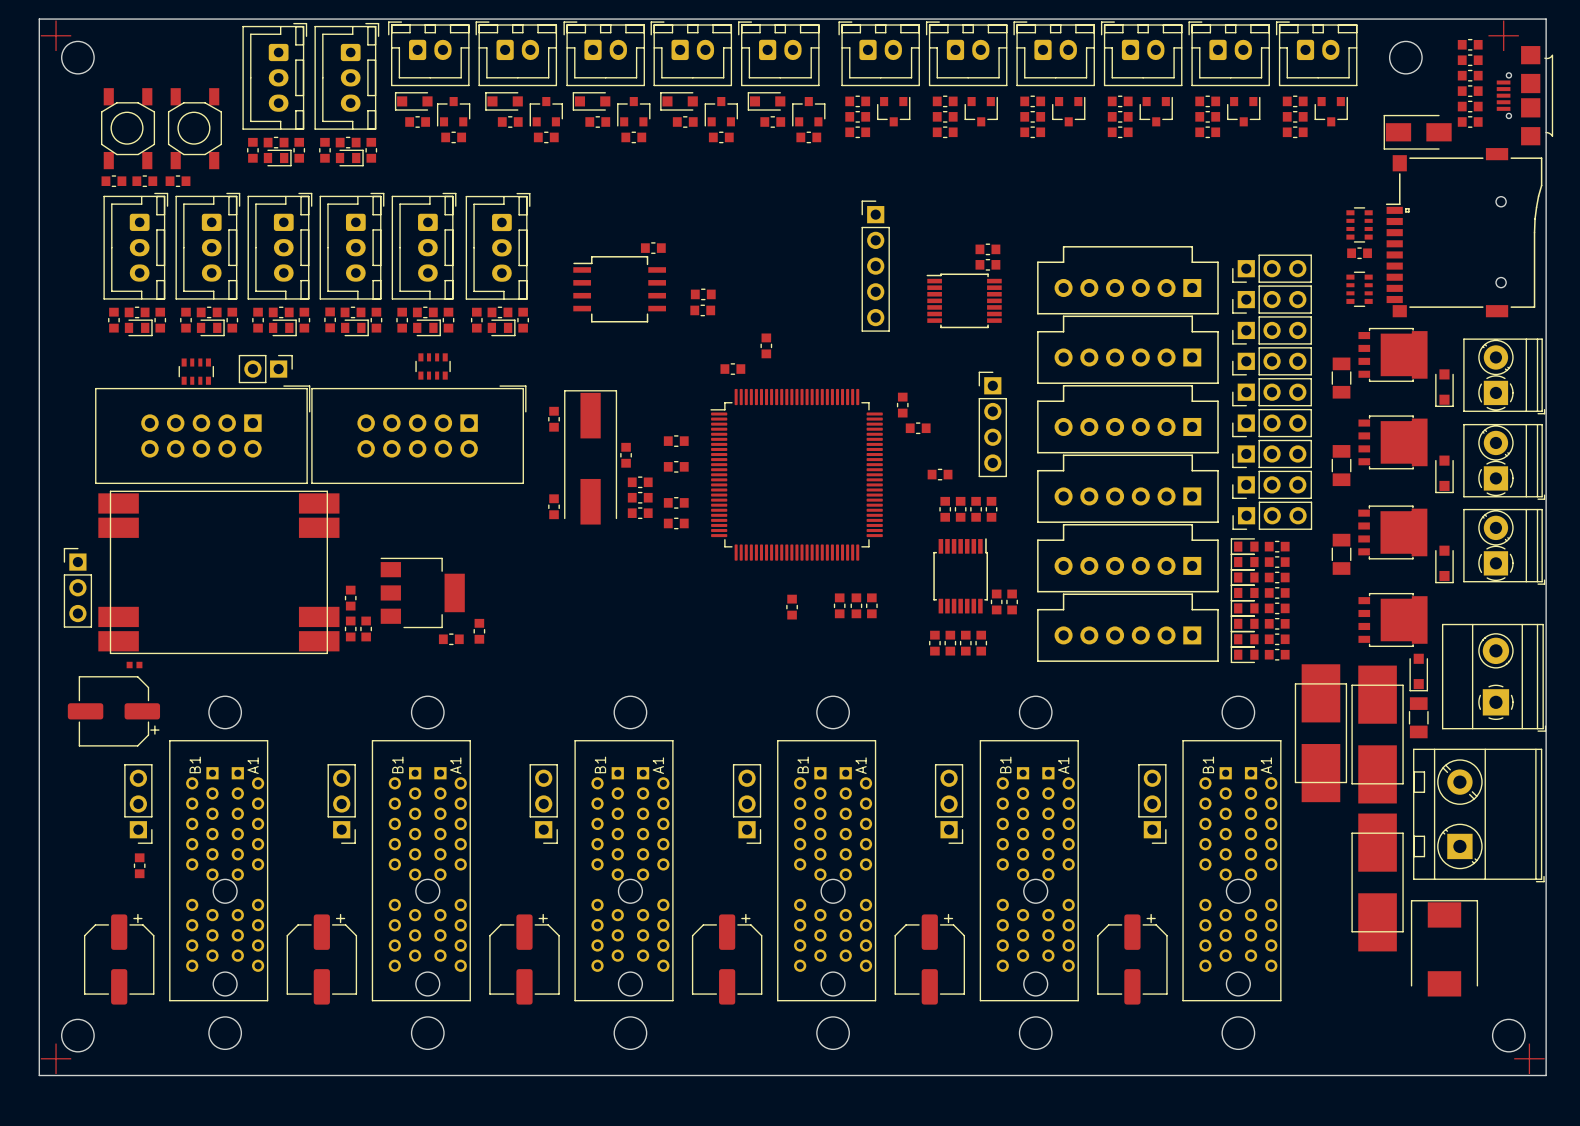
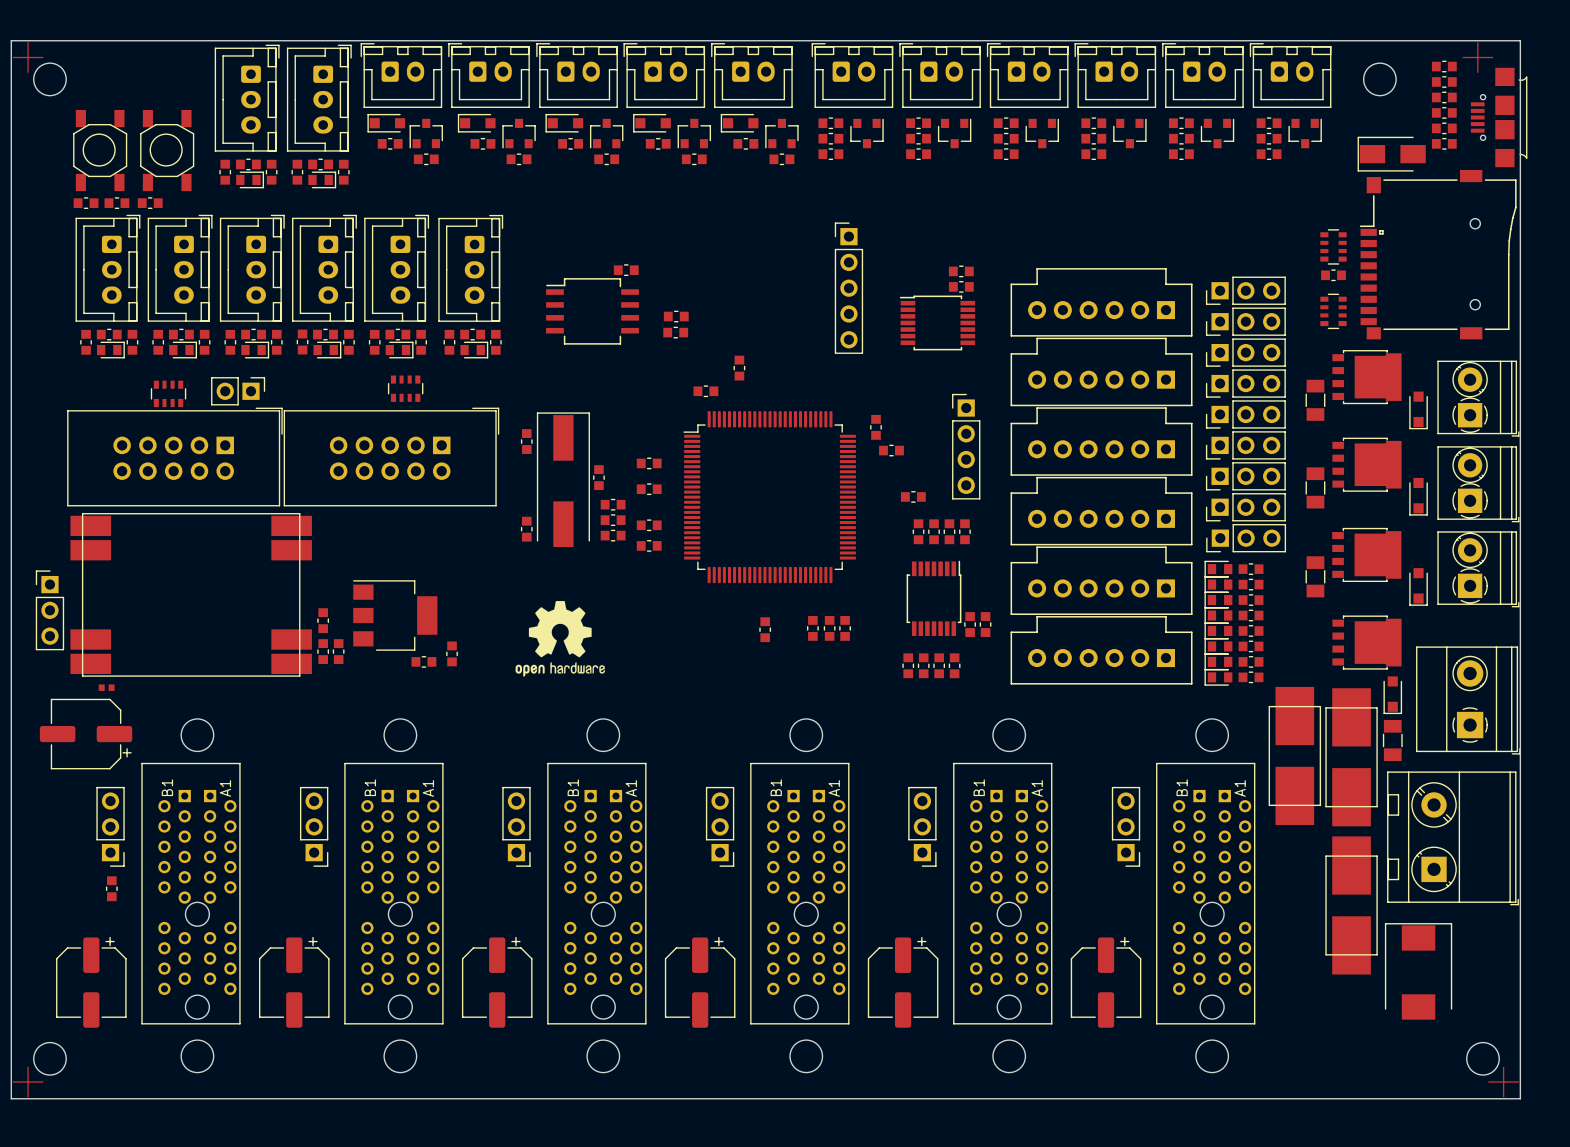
drawing: none -> [515, 600, 605, 677]

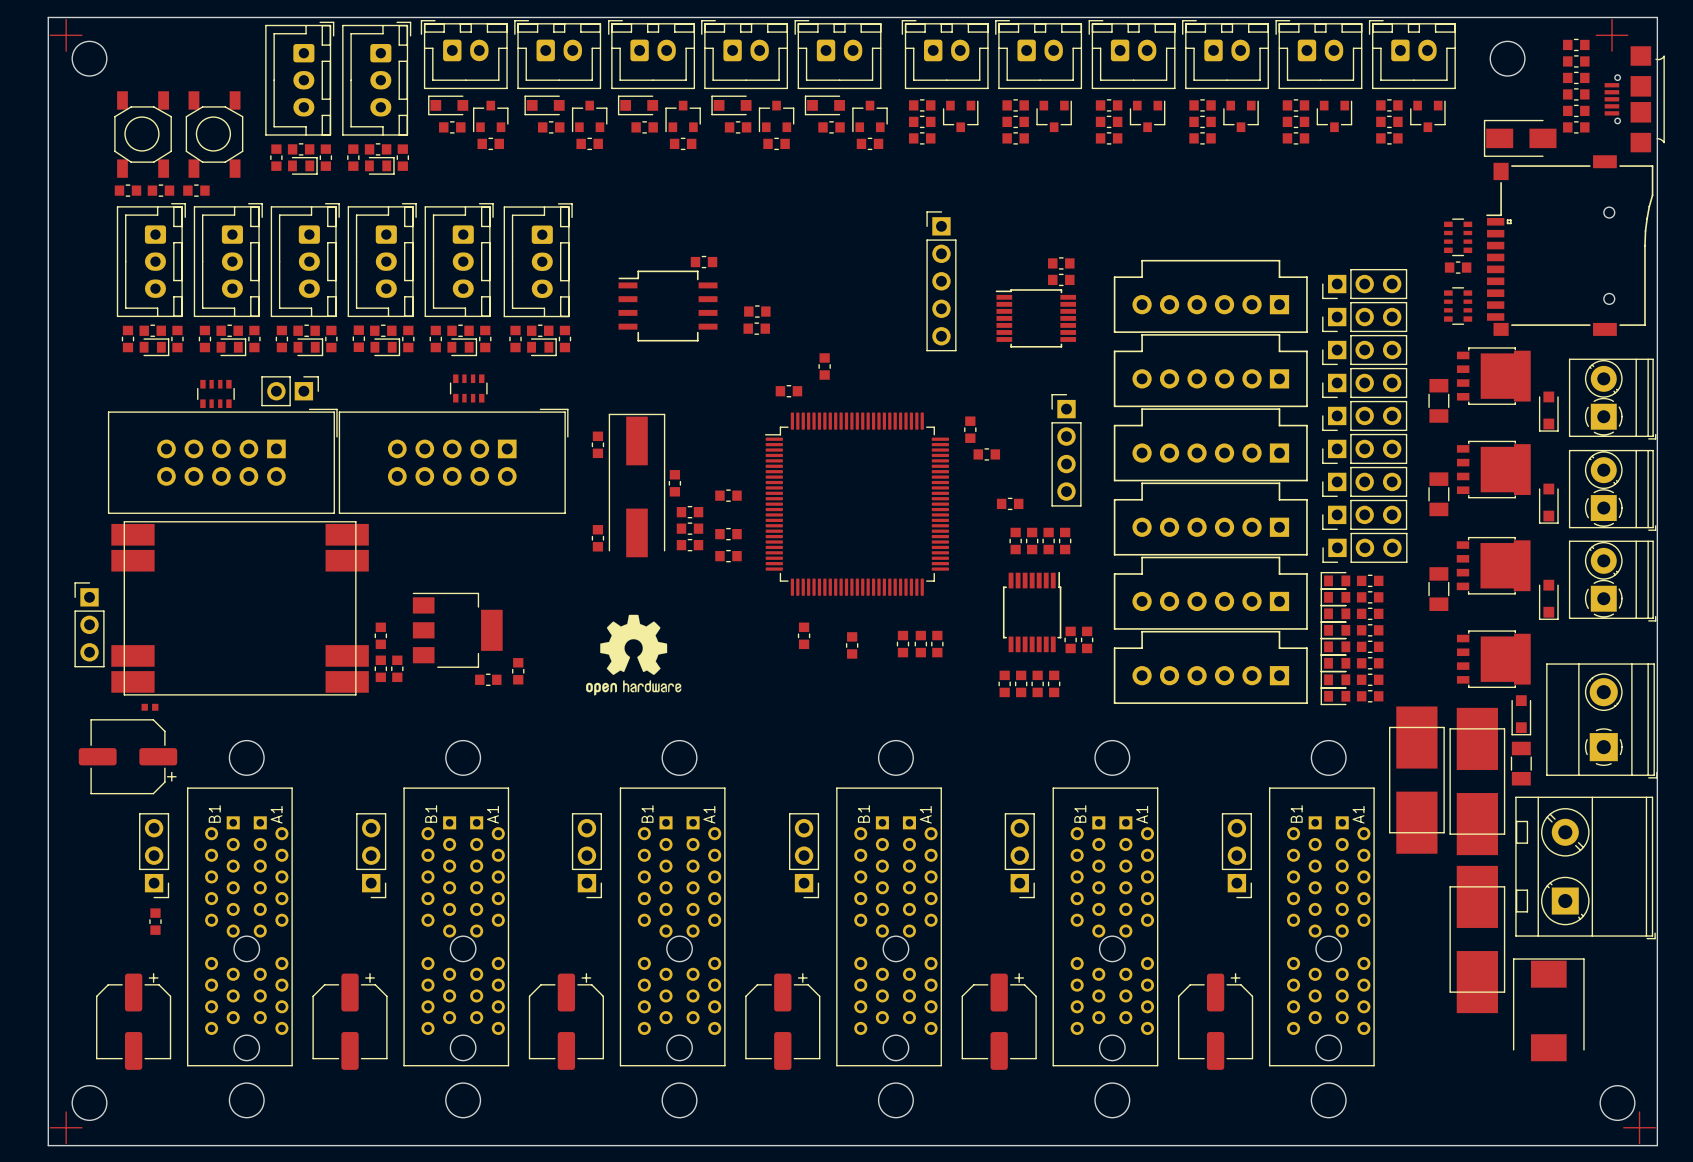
part rotation: 0° (649, 463) -> 90° clockwise (804, 635)
part position: (649, 463) -> (804, 635)

